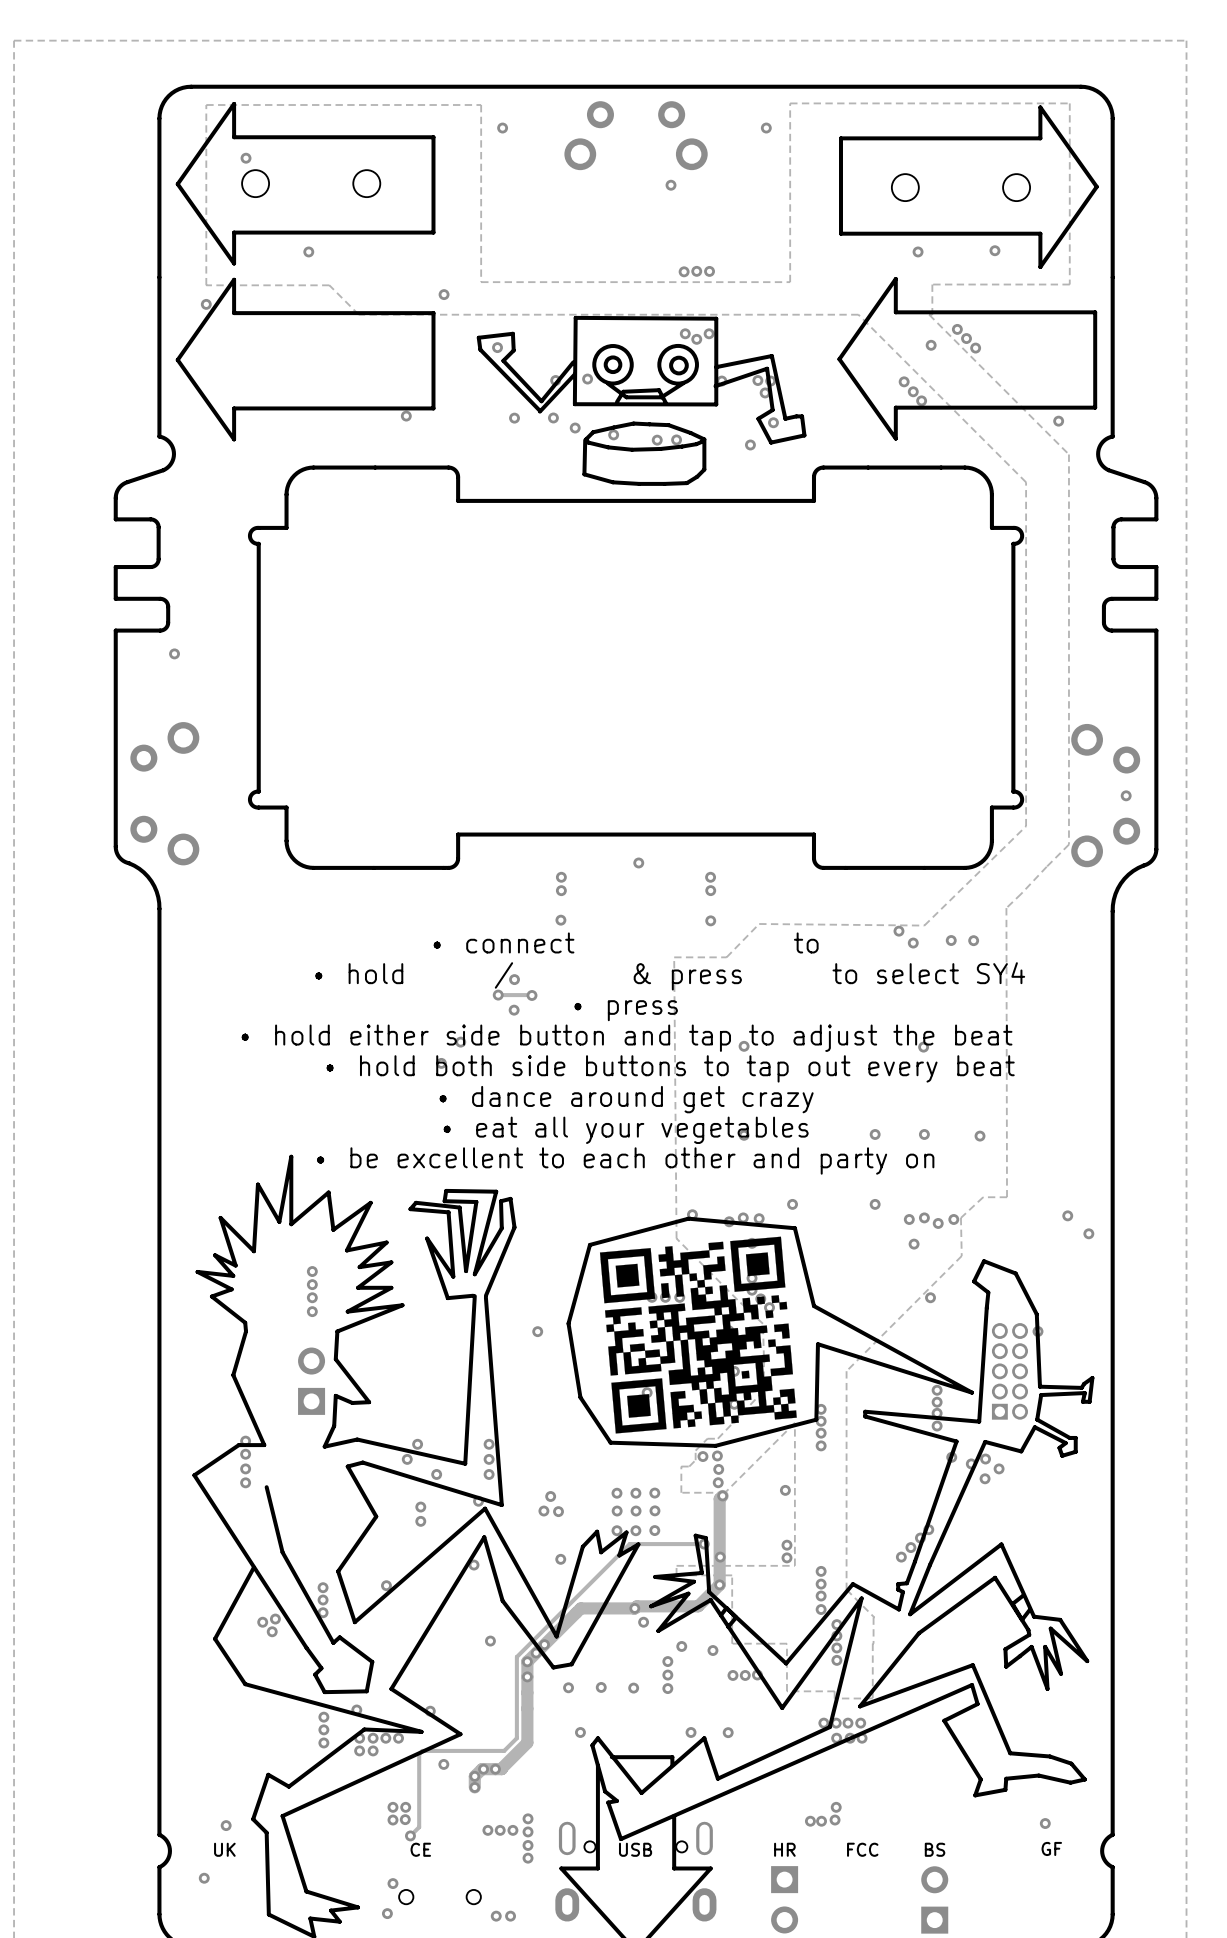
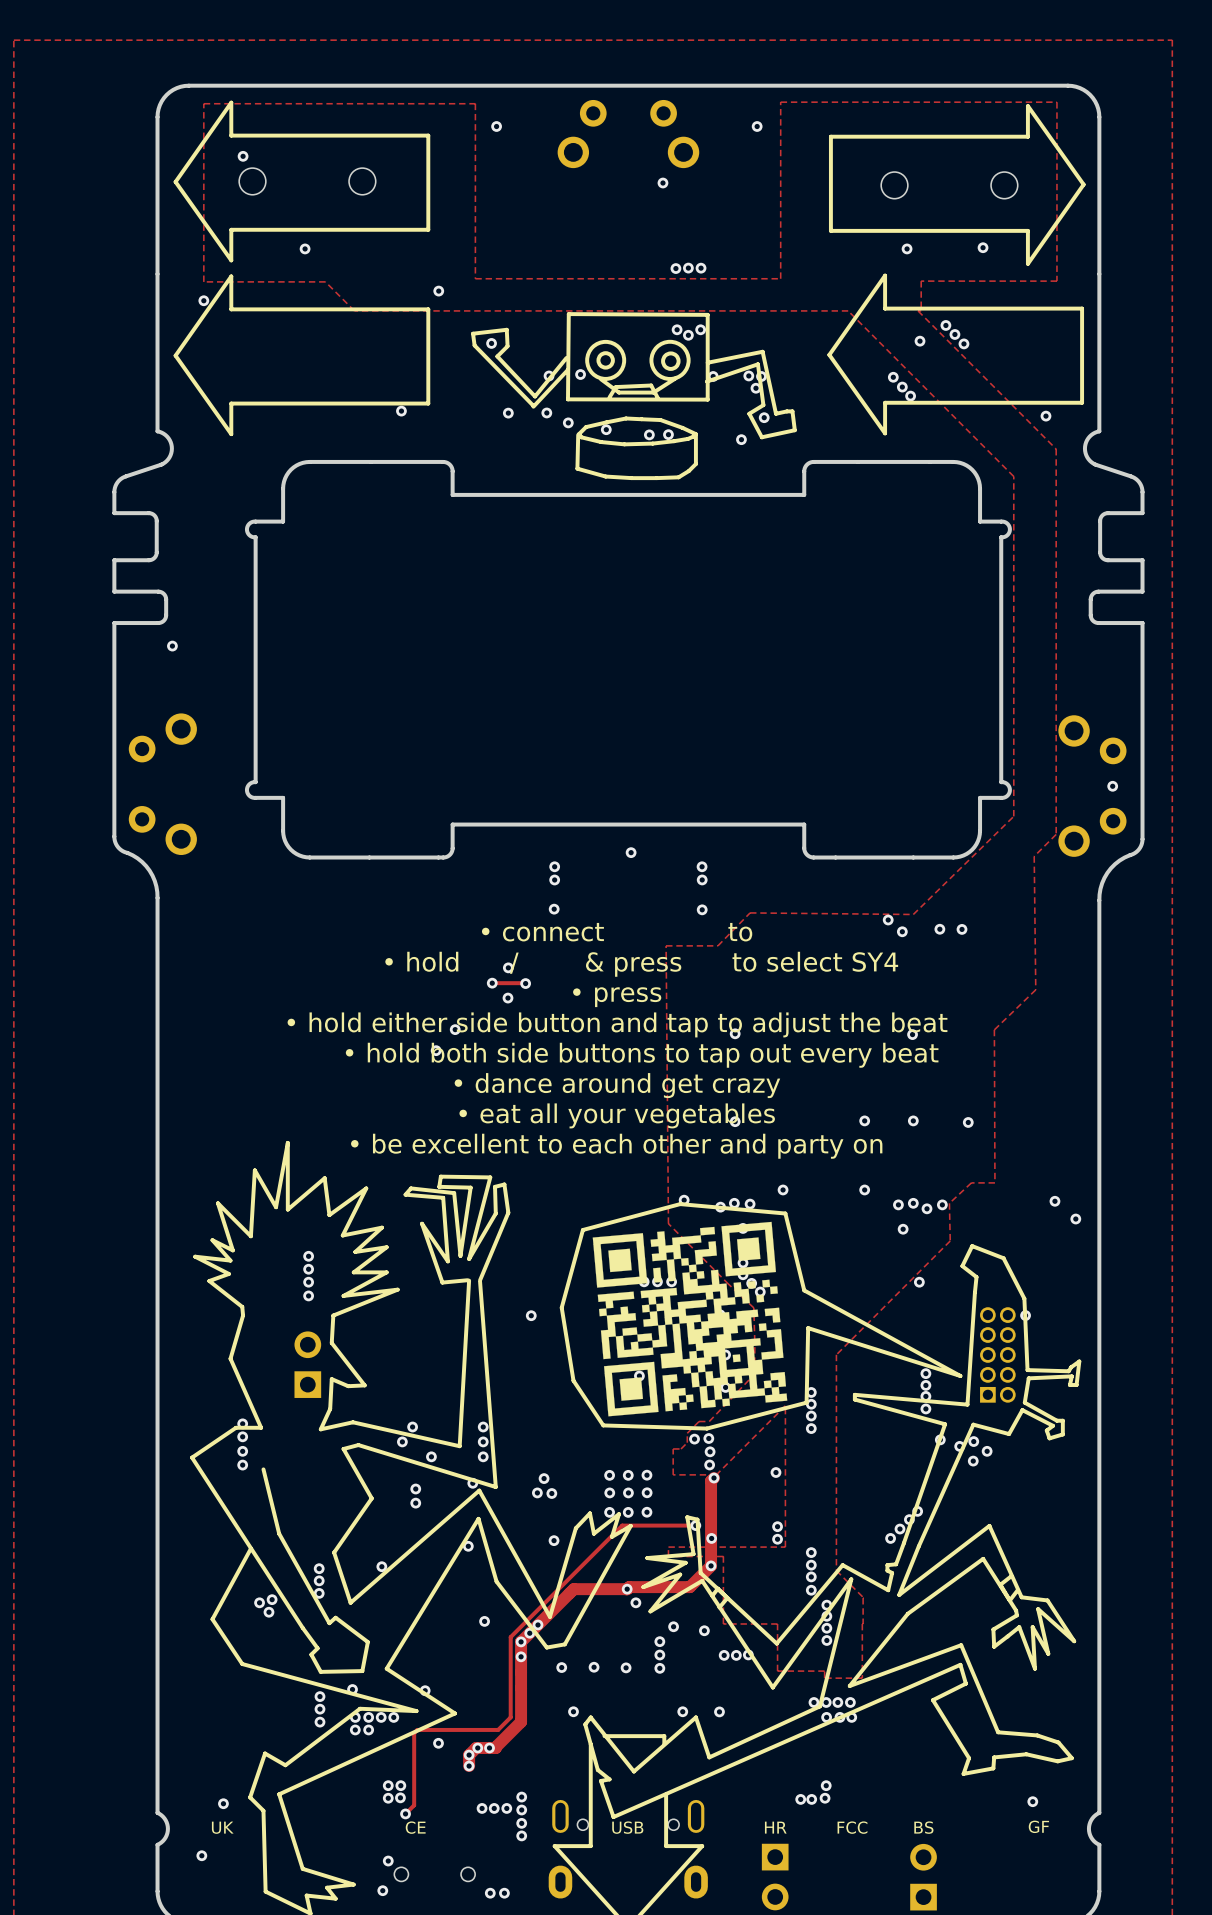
zone outline: (1046, 866) (1006, 908) (1007, 1197) -> (1034, 856) (1035, 989) (994, 1029) (994, 1182)

